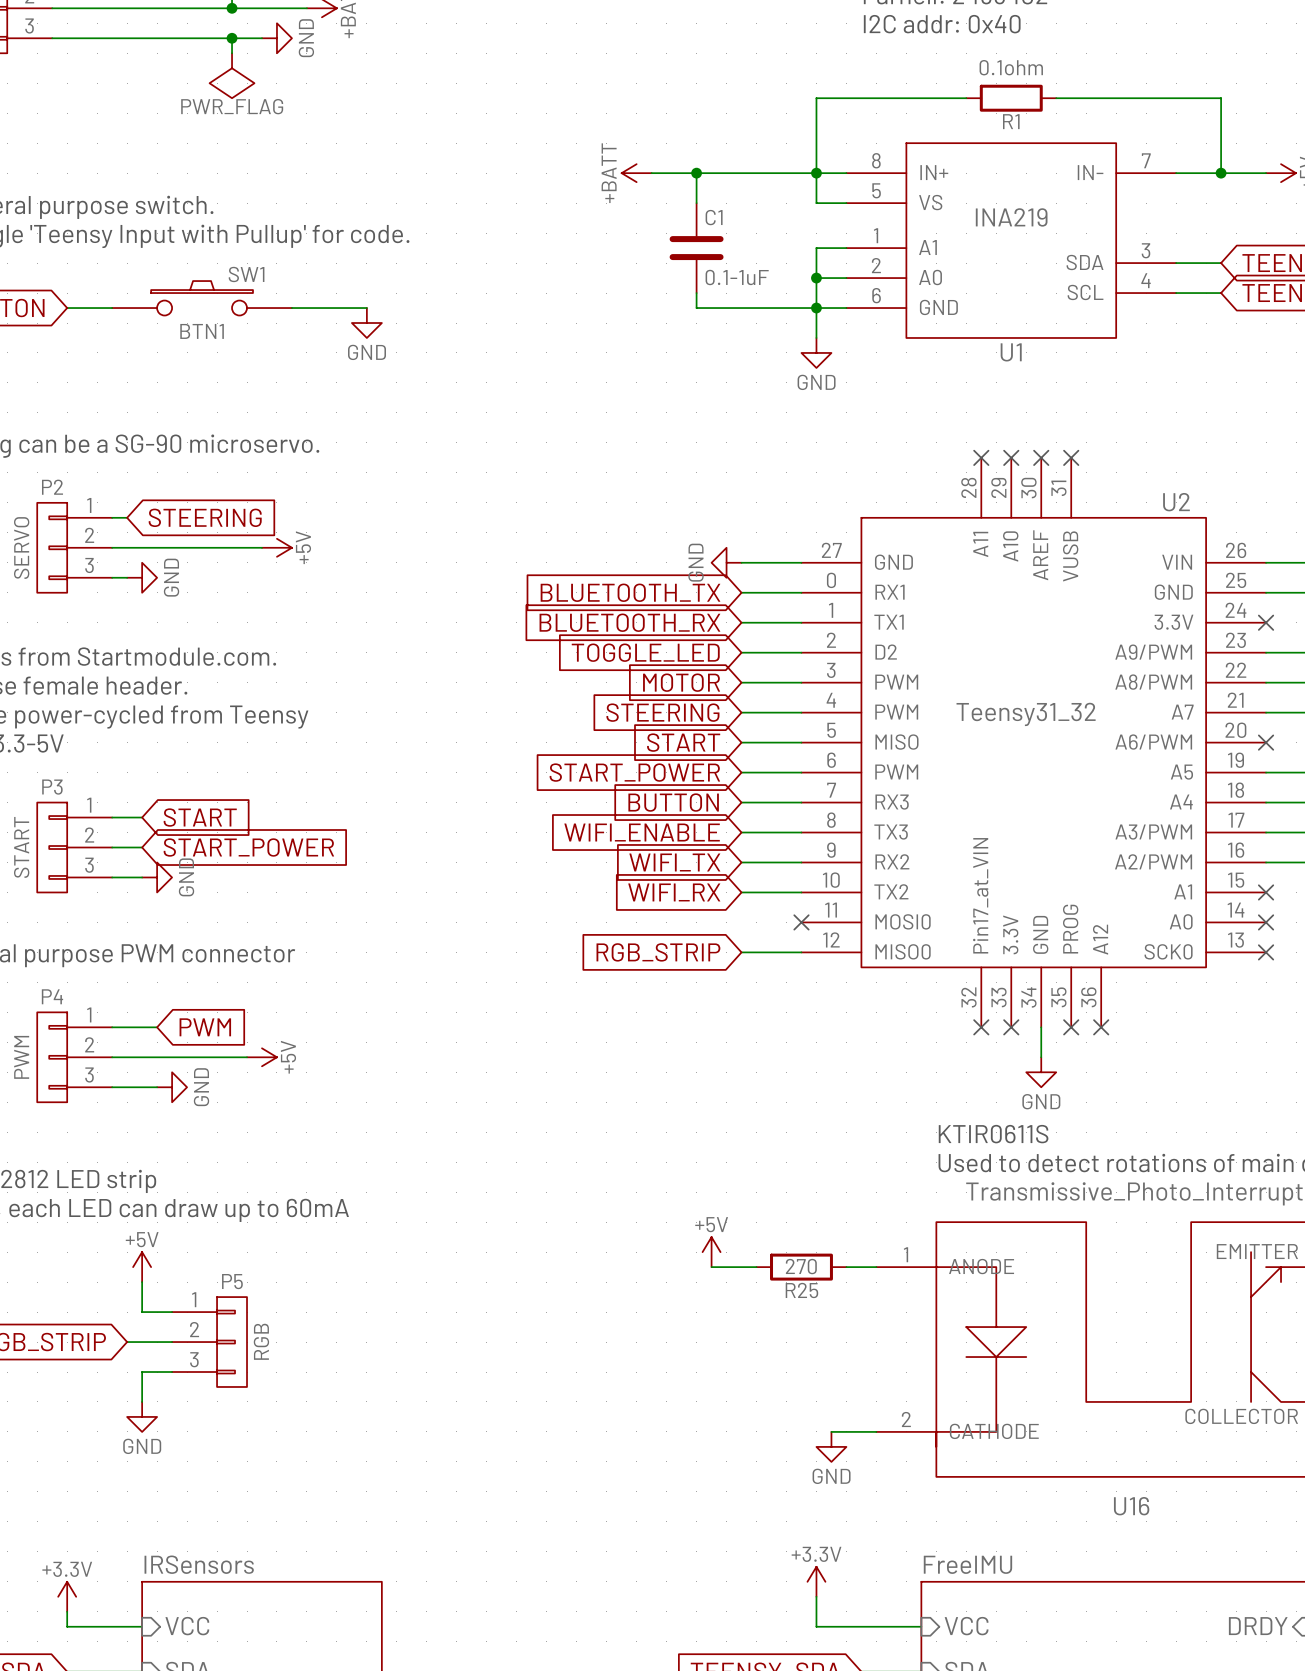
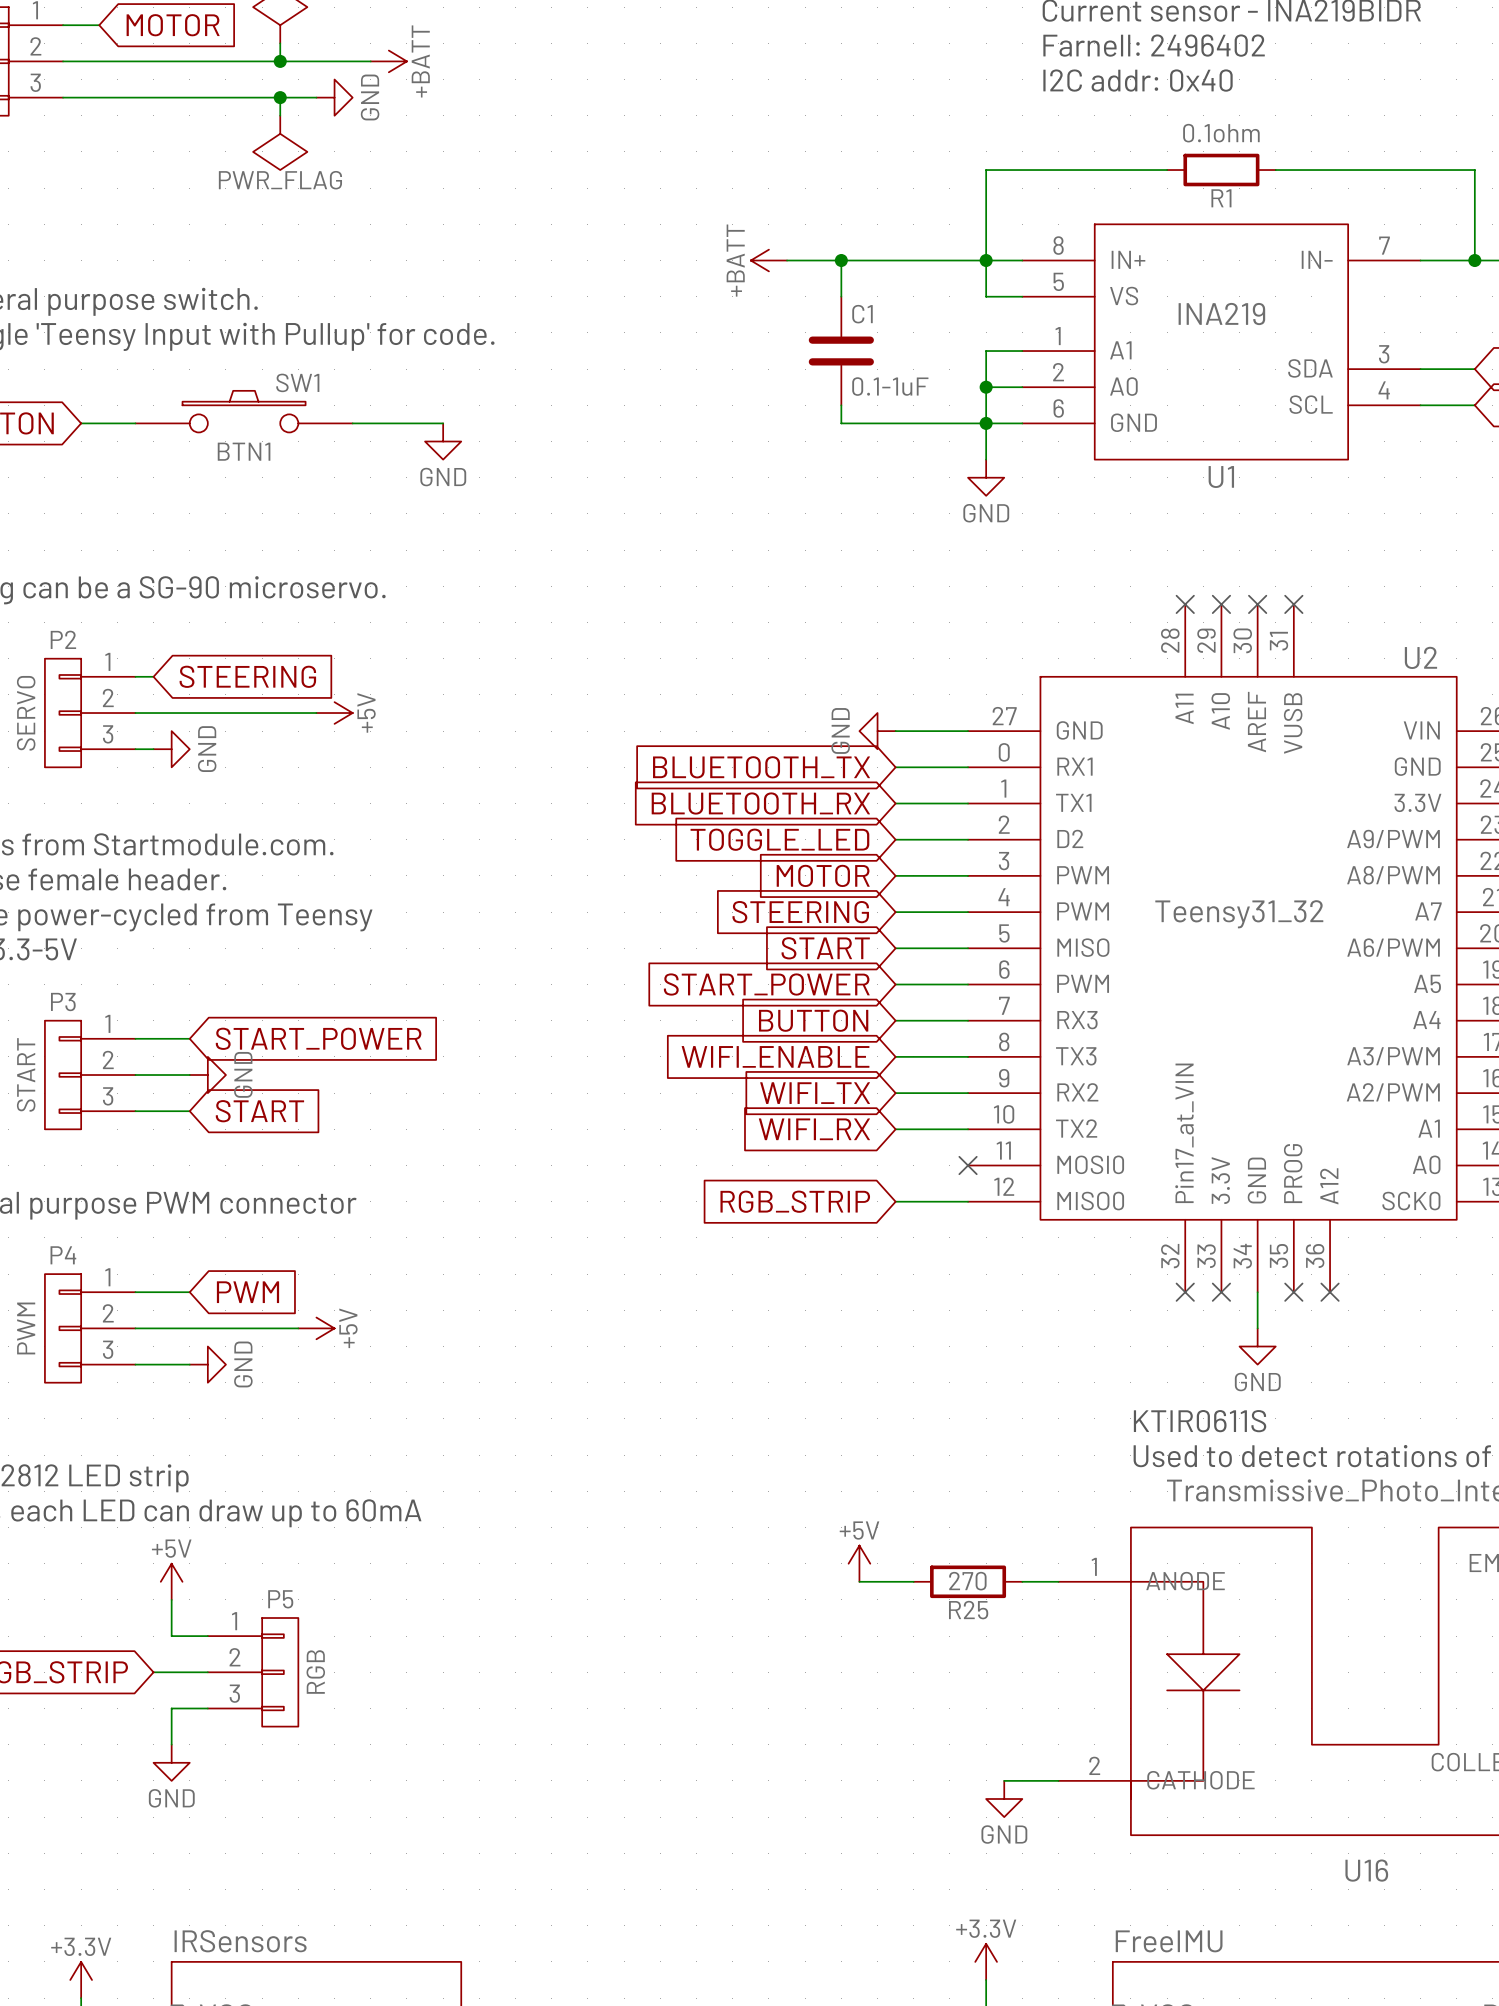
wire: none -> (171, 1038) (189, 1038)
global label position: START (200, 817) -> START (259, 1111)
wire: none -> (171, 1075) (189, 1075)
global label position: START_POWER (248, 847) -> START_POWER (318, 1038)
power symbol position: GND (157, 877) -> GND (207, 1075)

